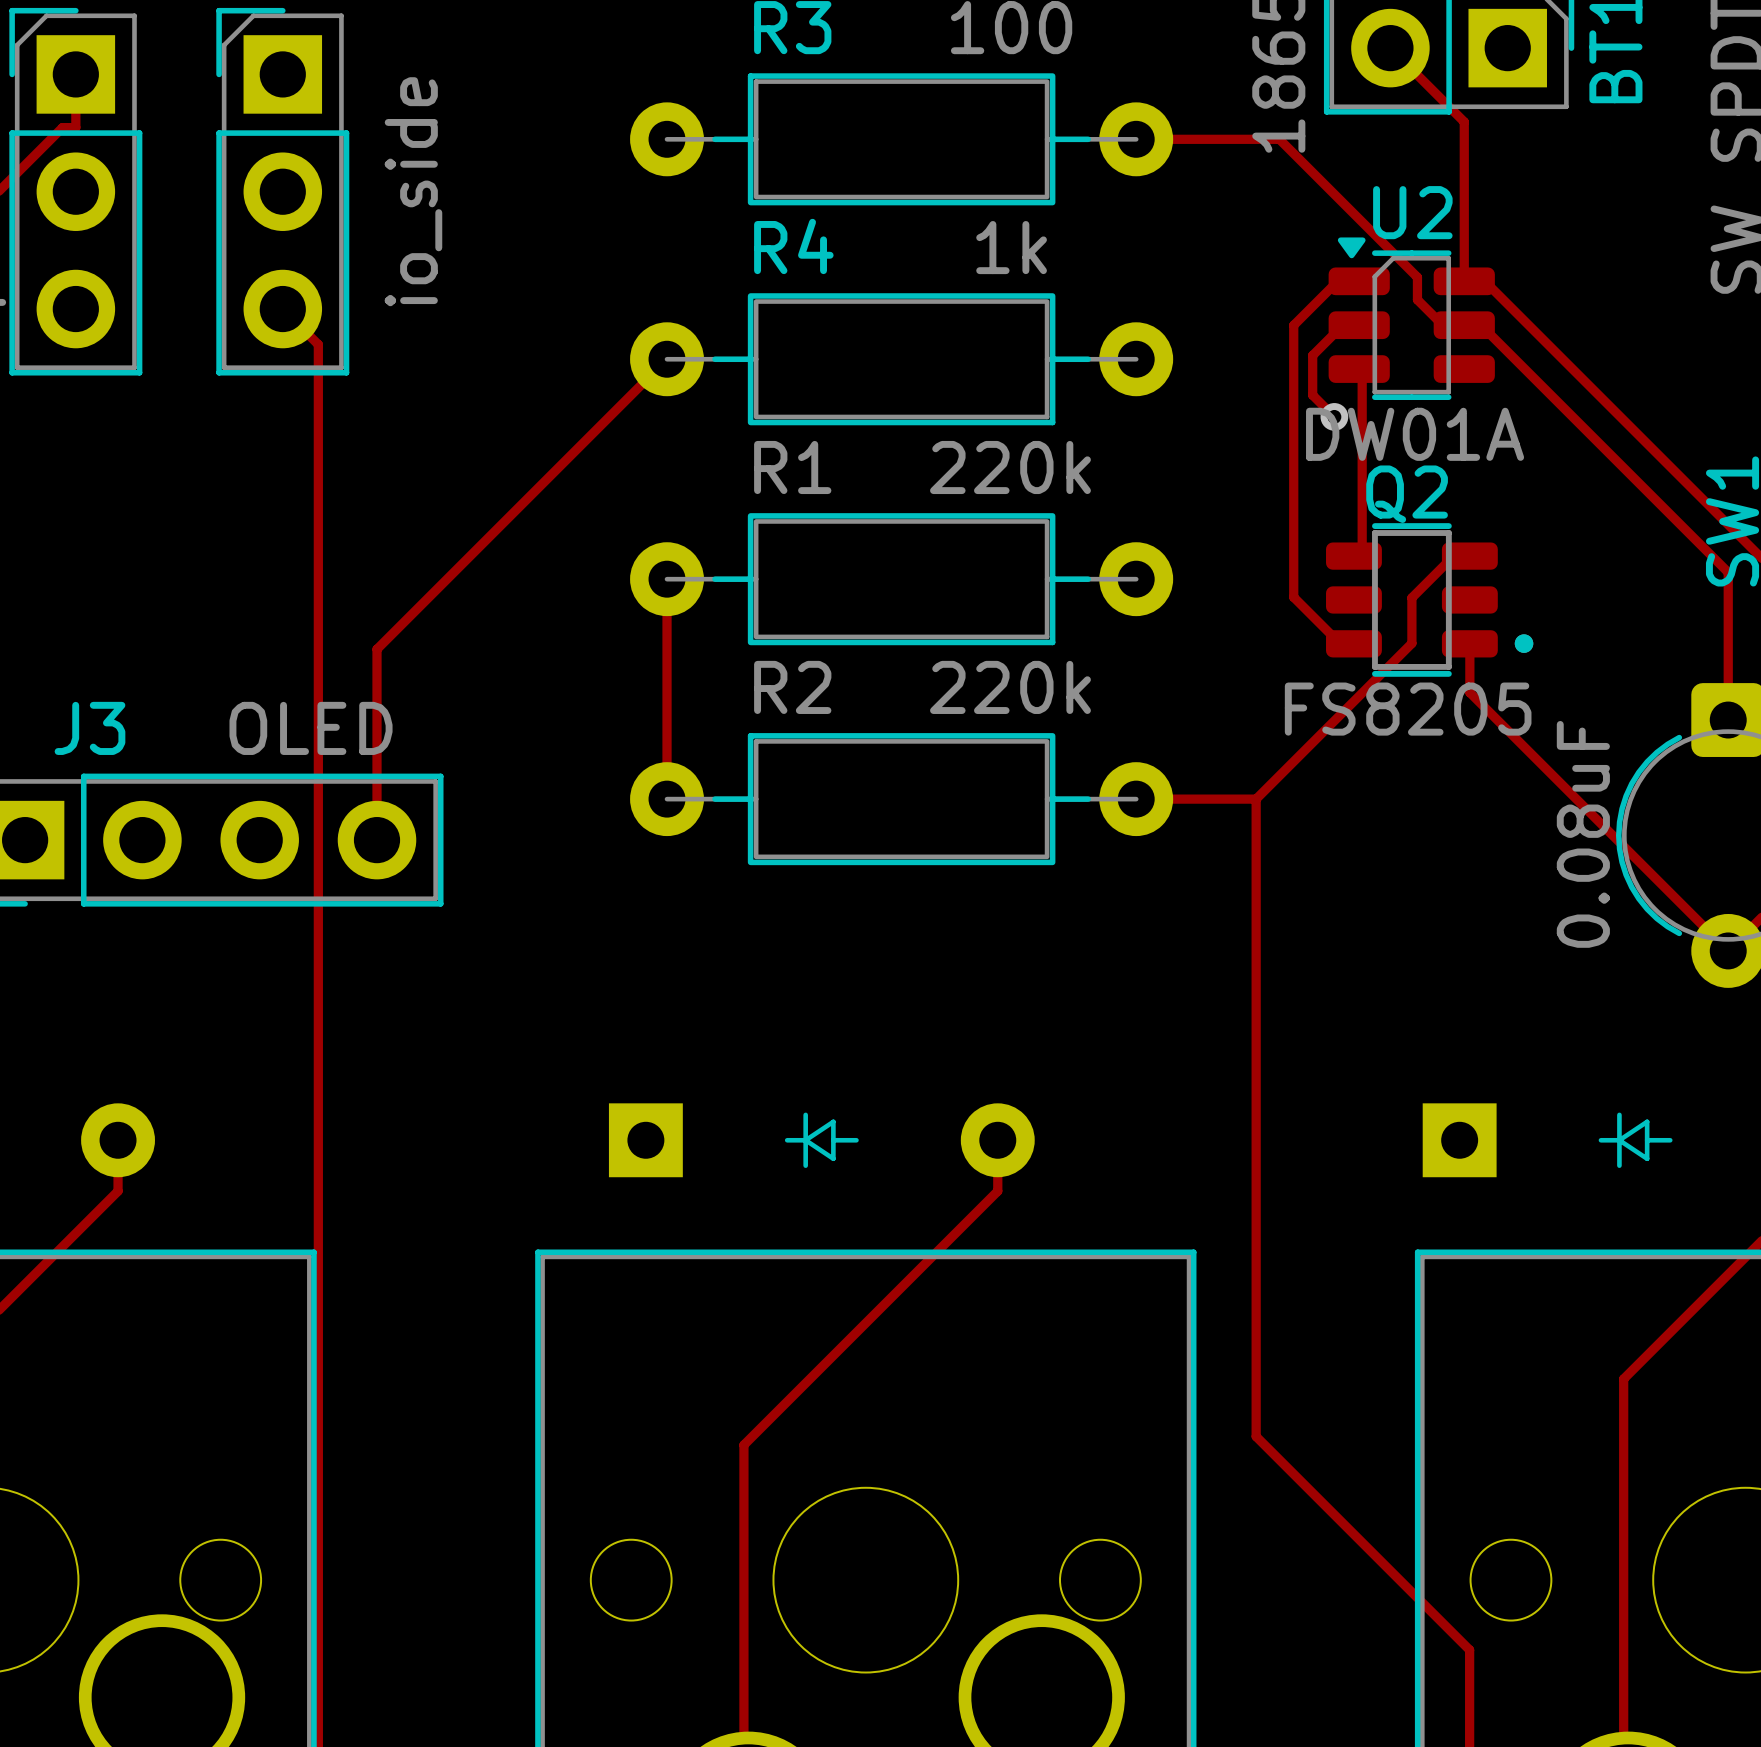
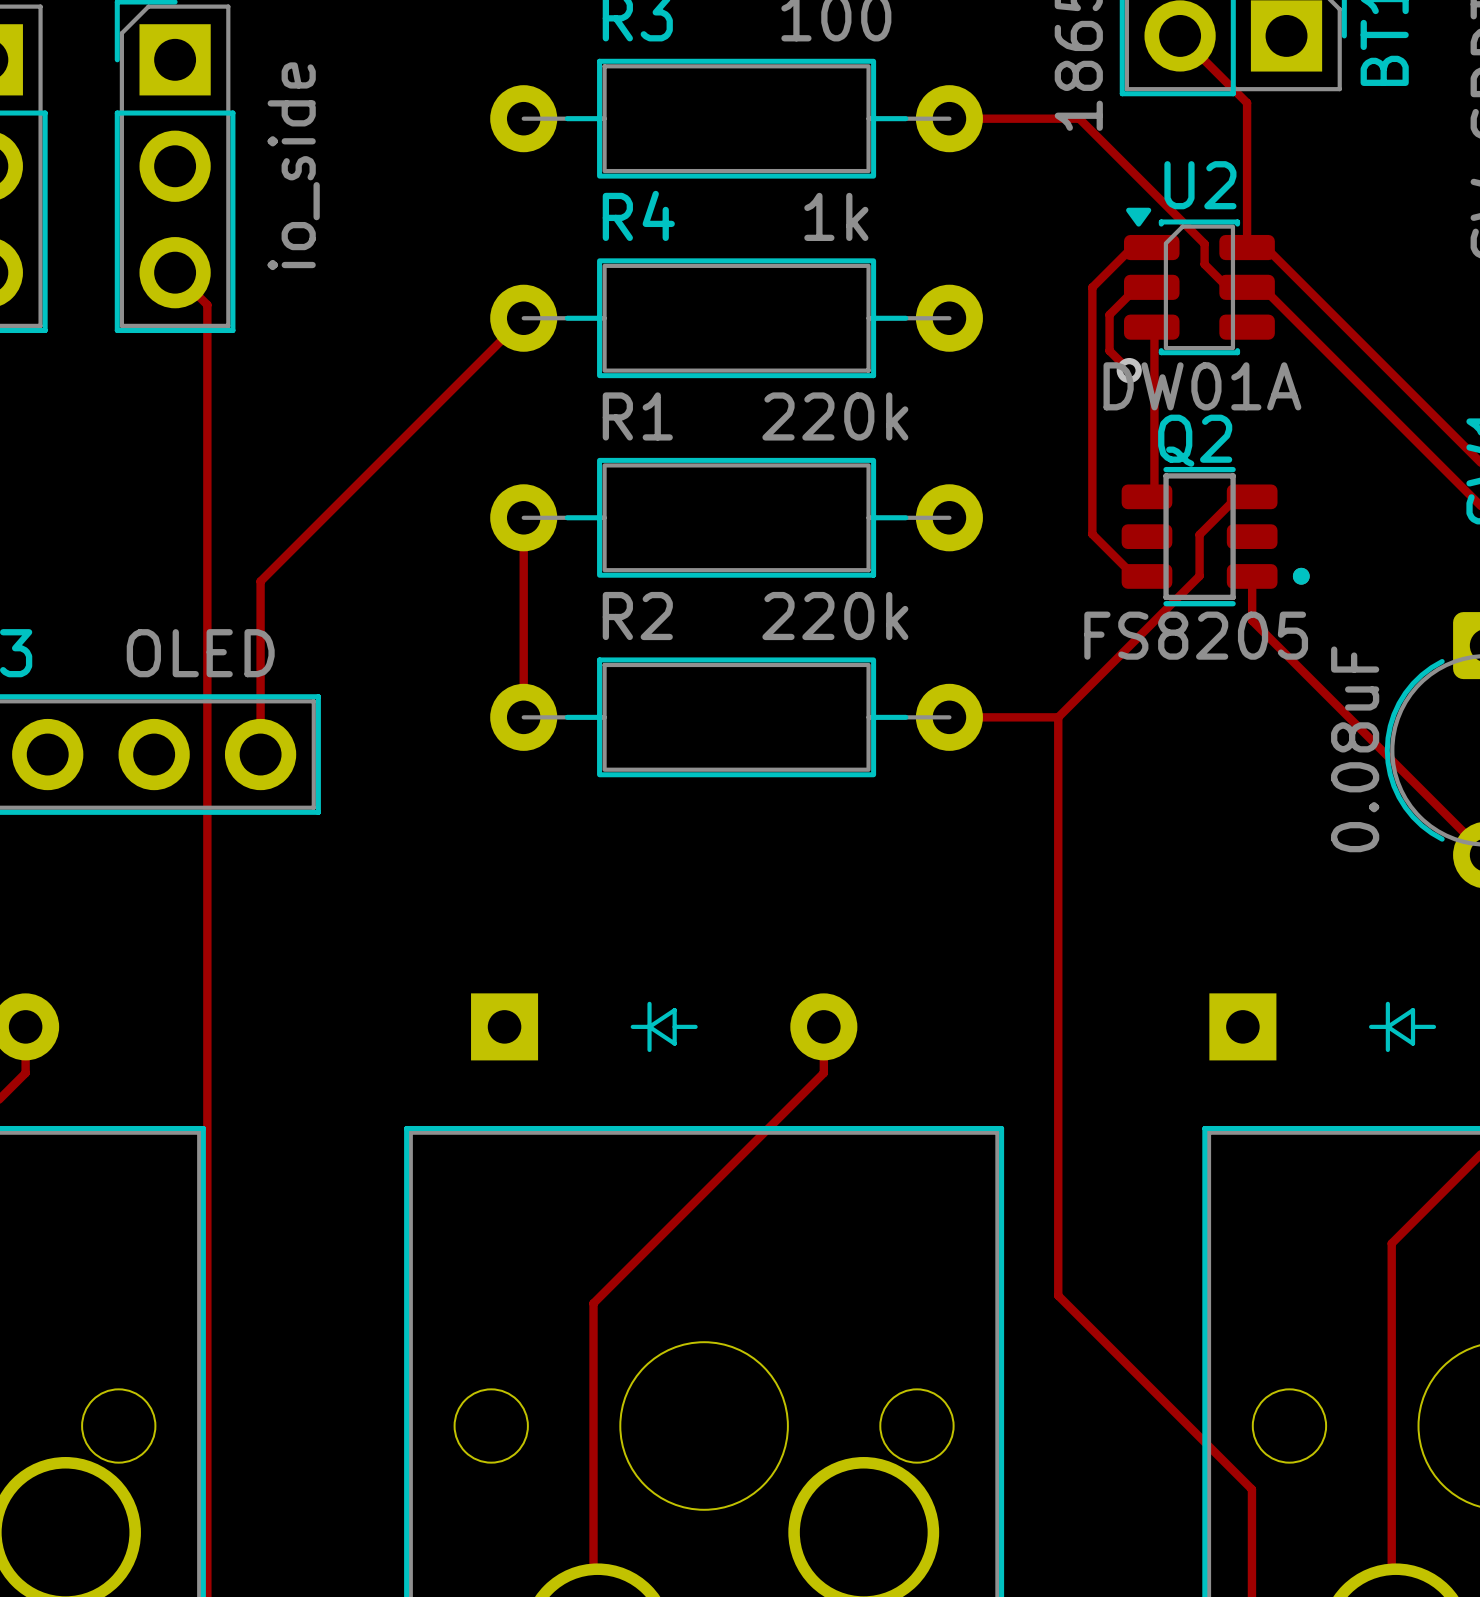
U2 footprint: [1328, 237, 1495, 401] -> [1124, 207, 1275, 356]

